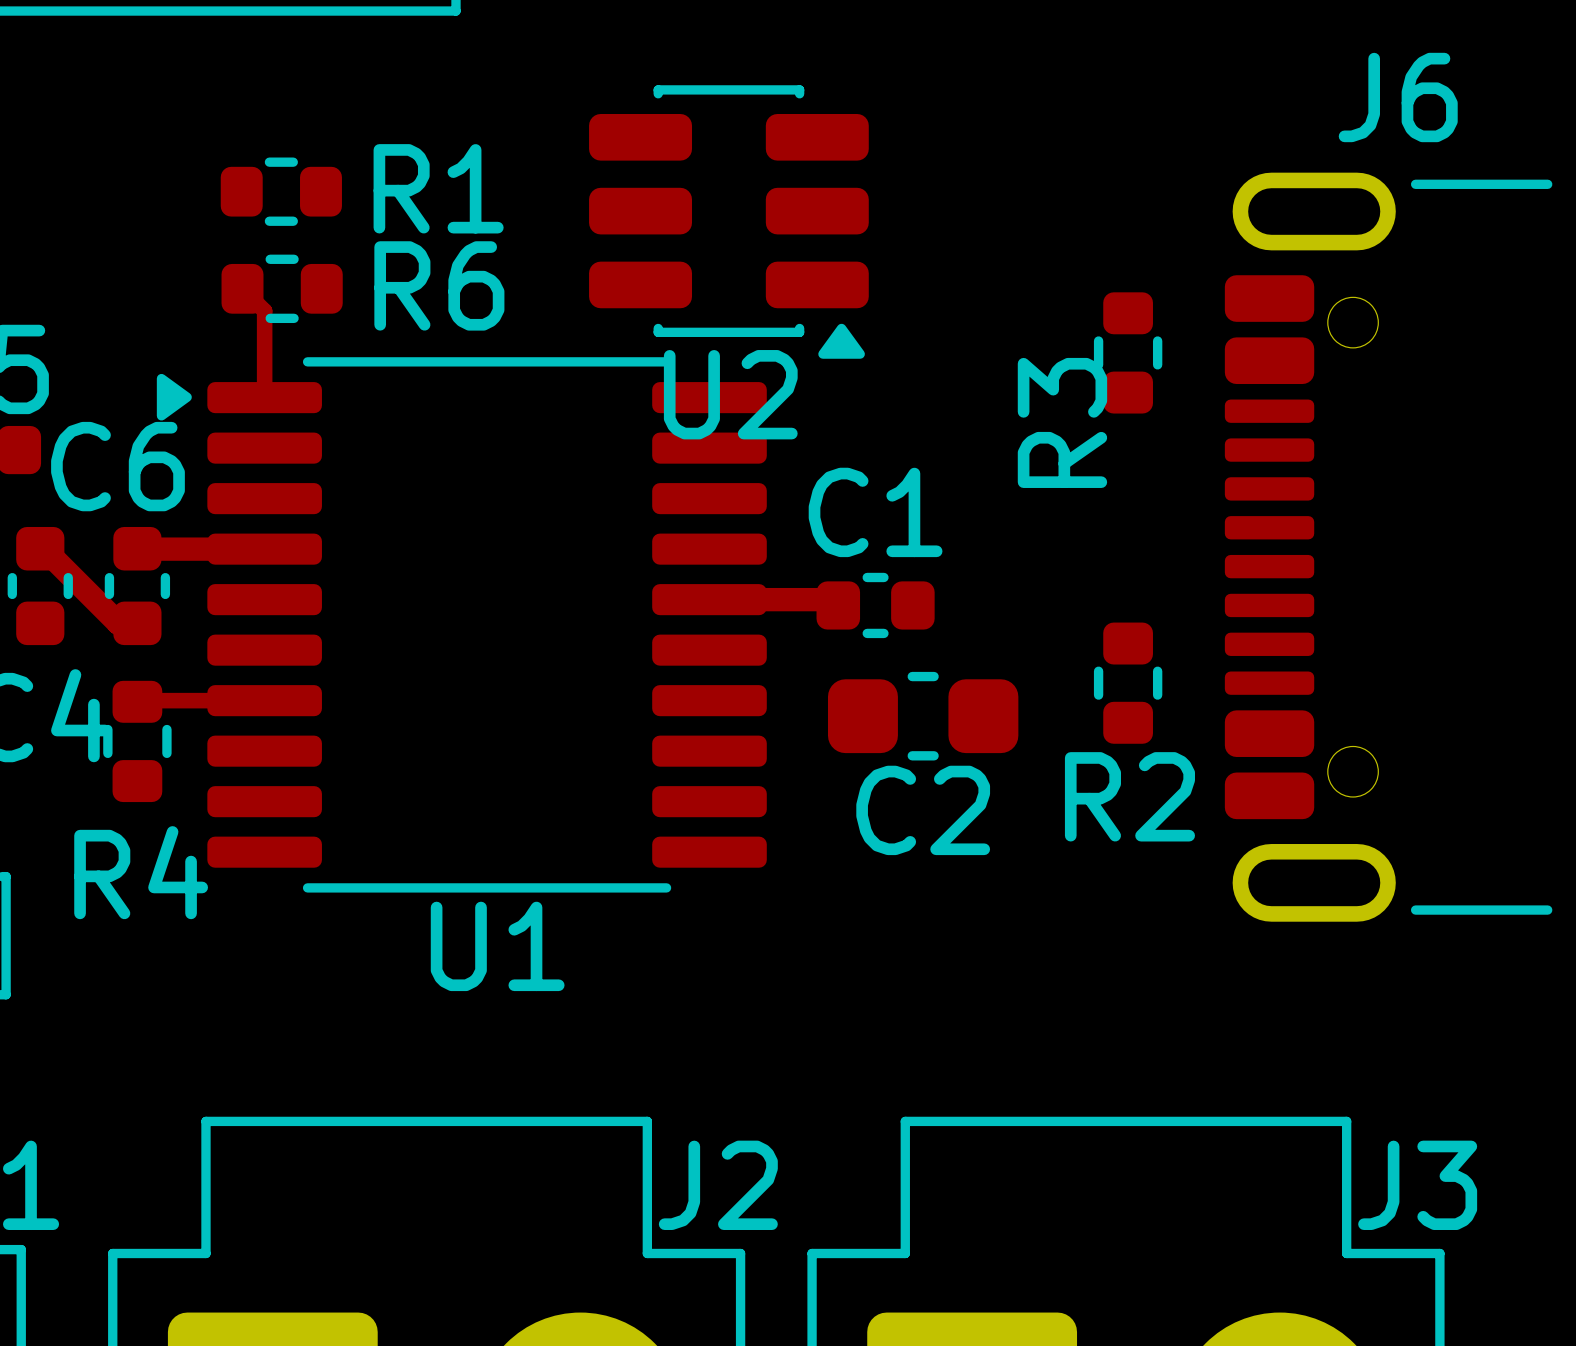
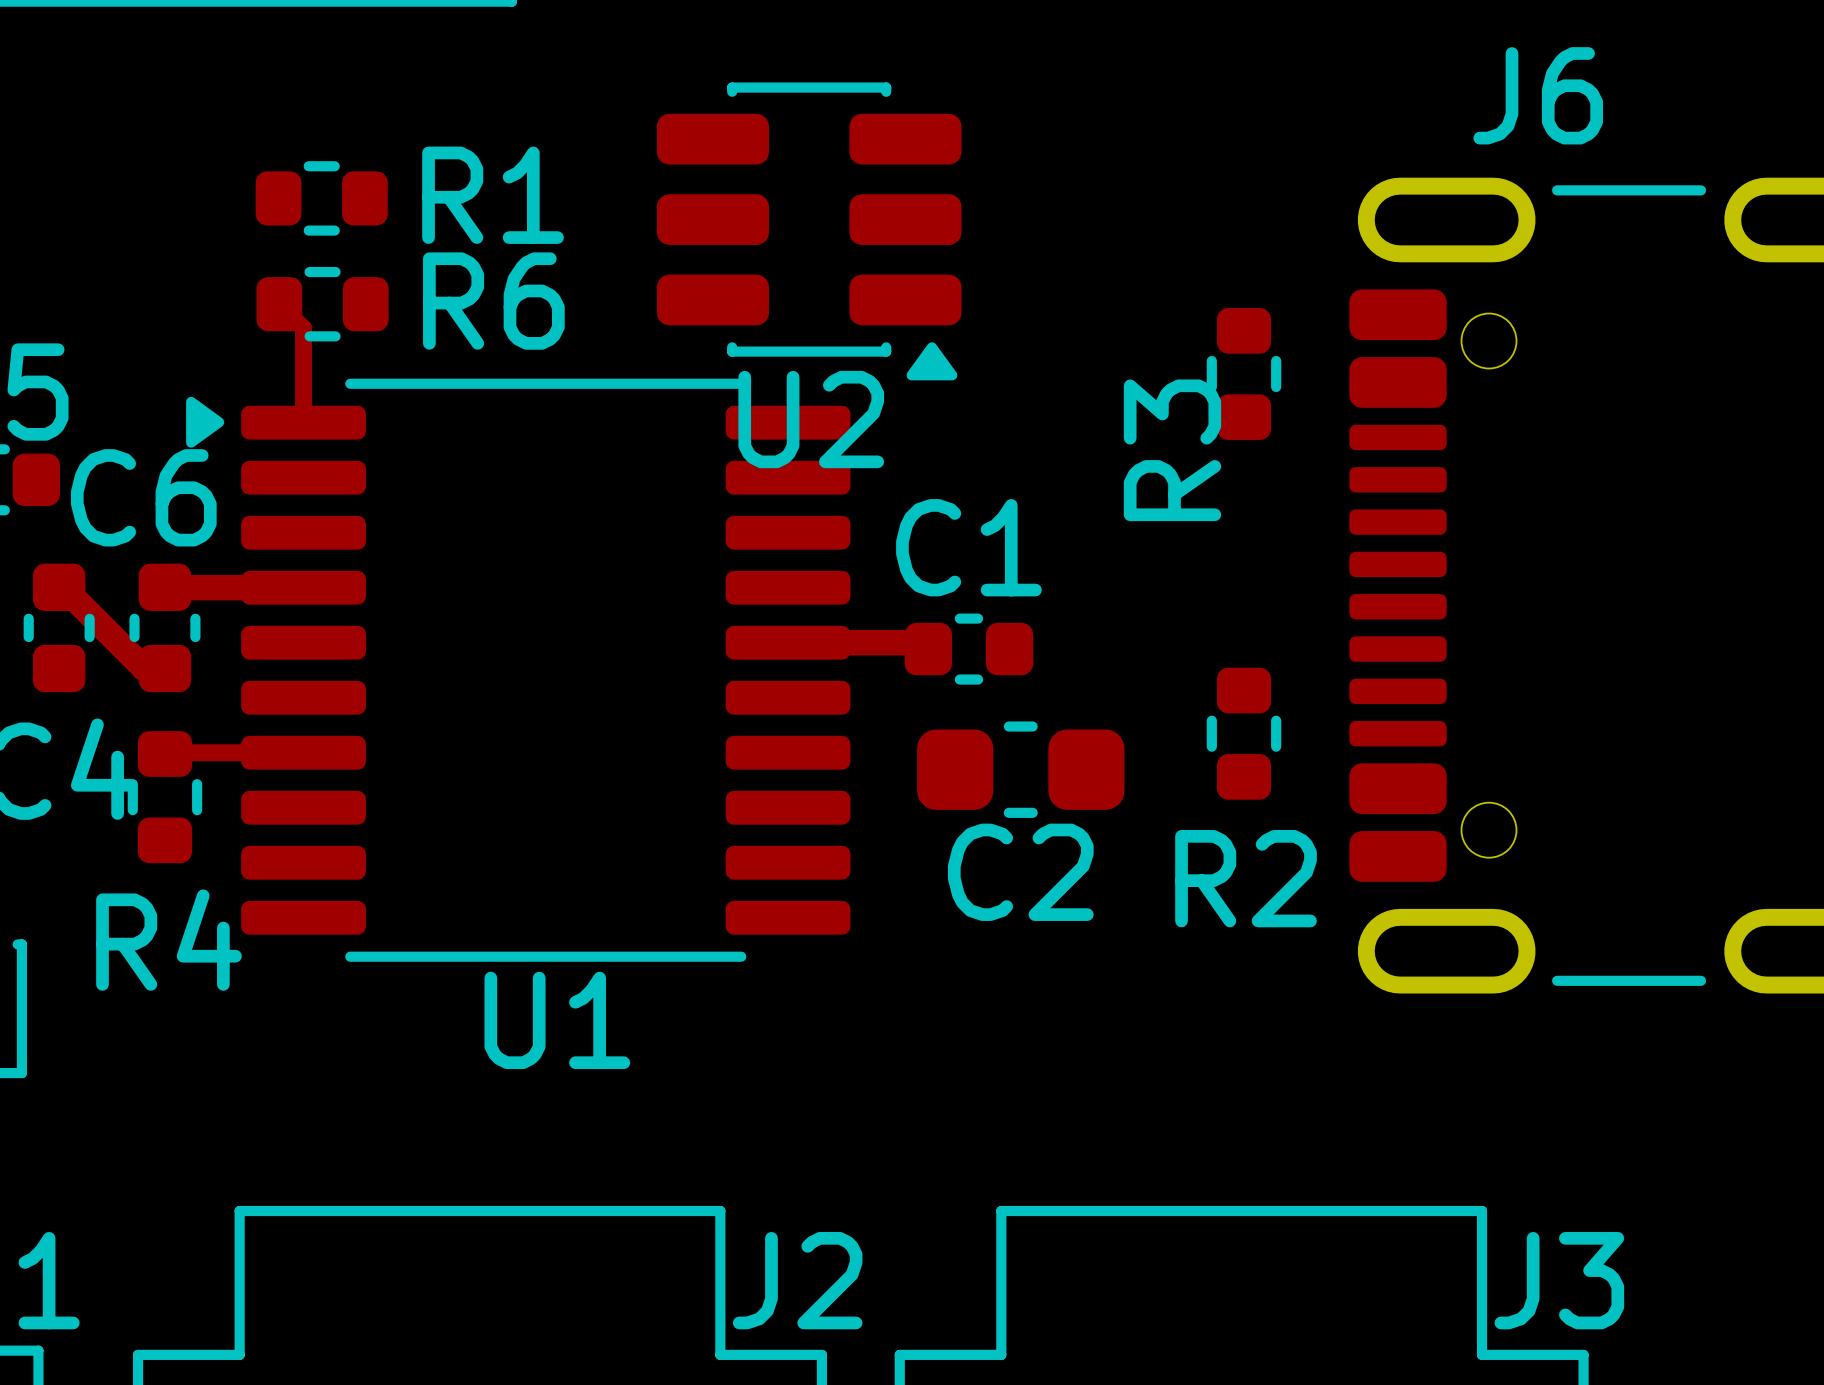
R2 name position: R2 (1129, 796) -> R2 (1246, 878)

